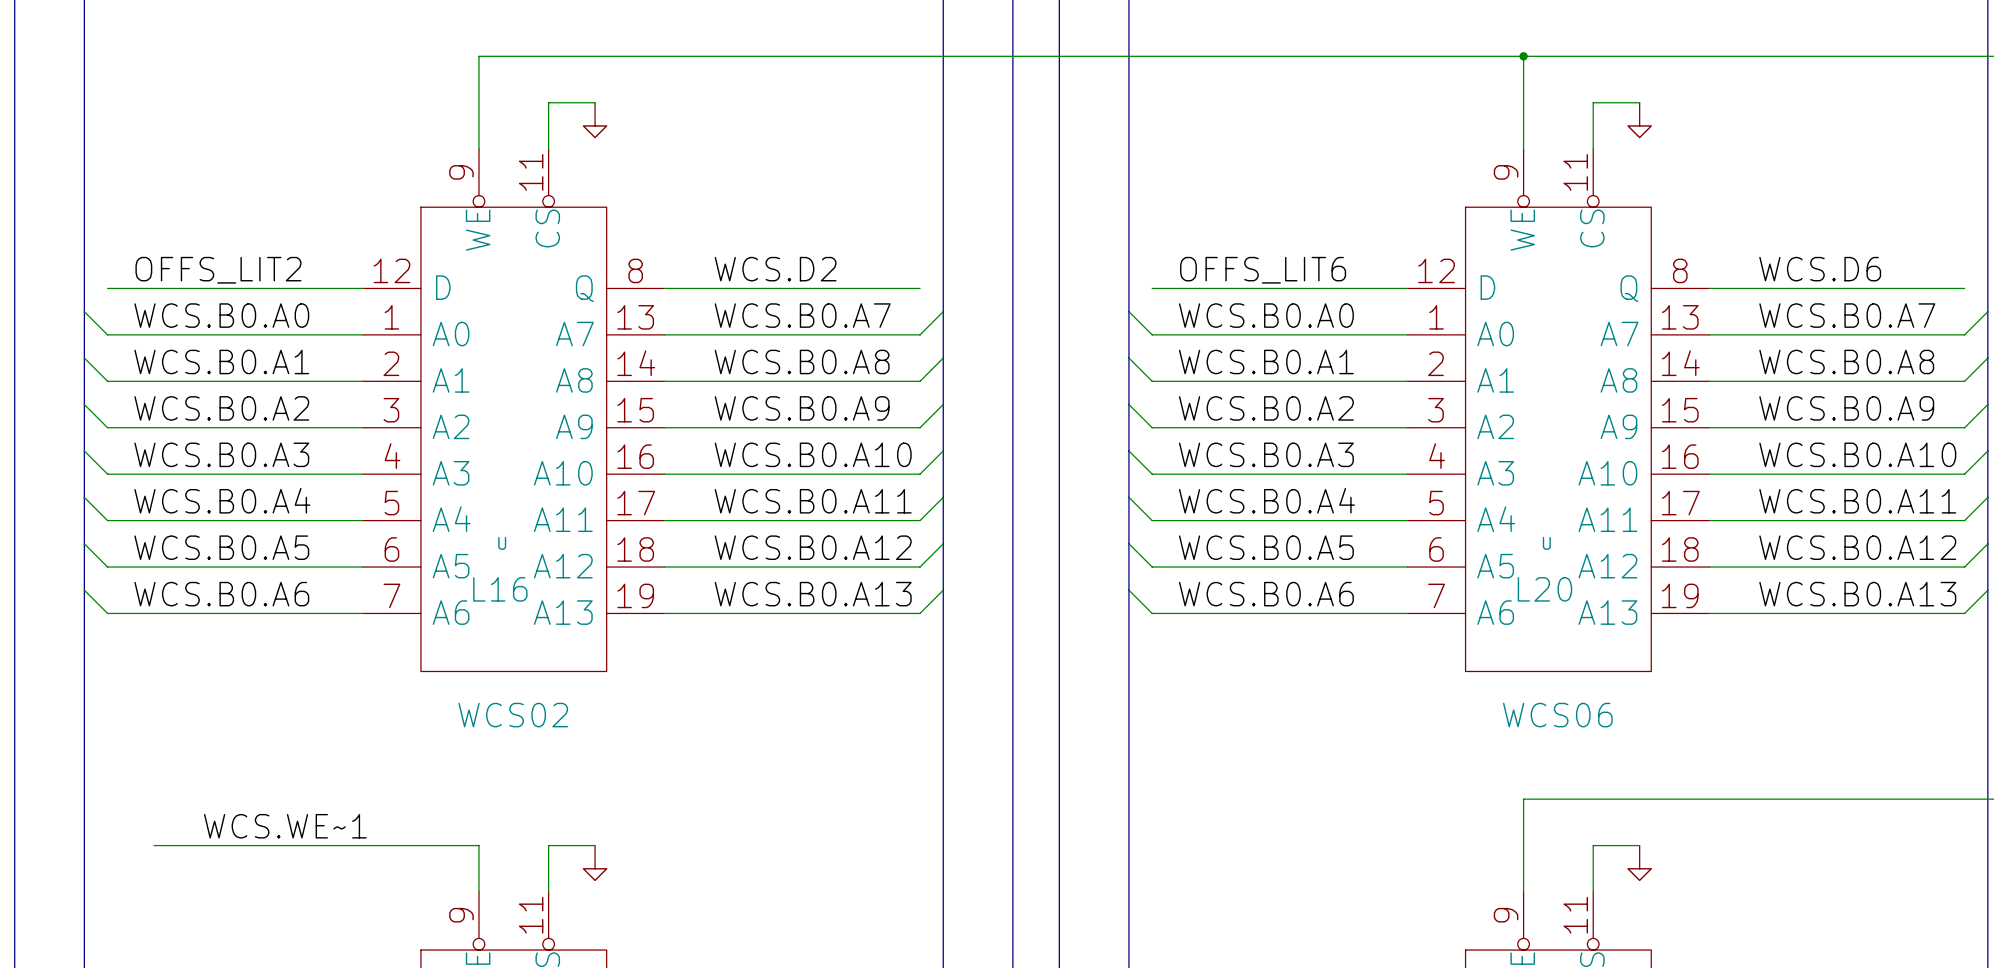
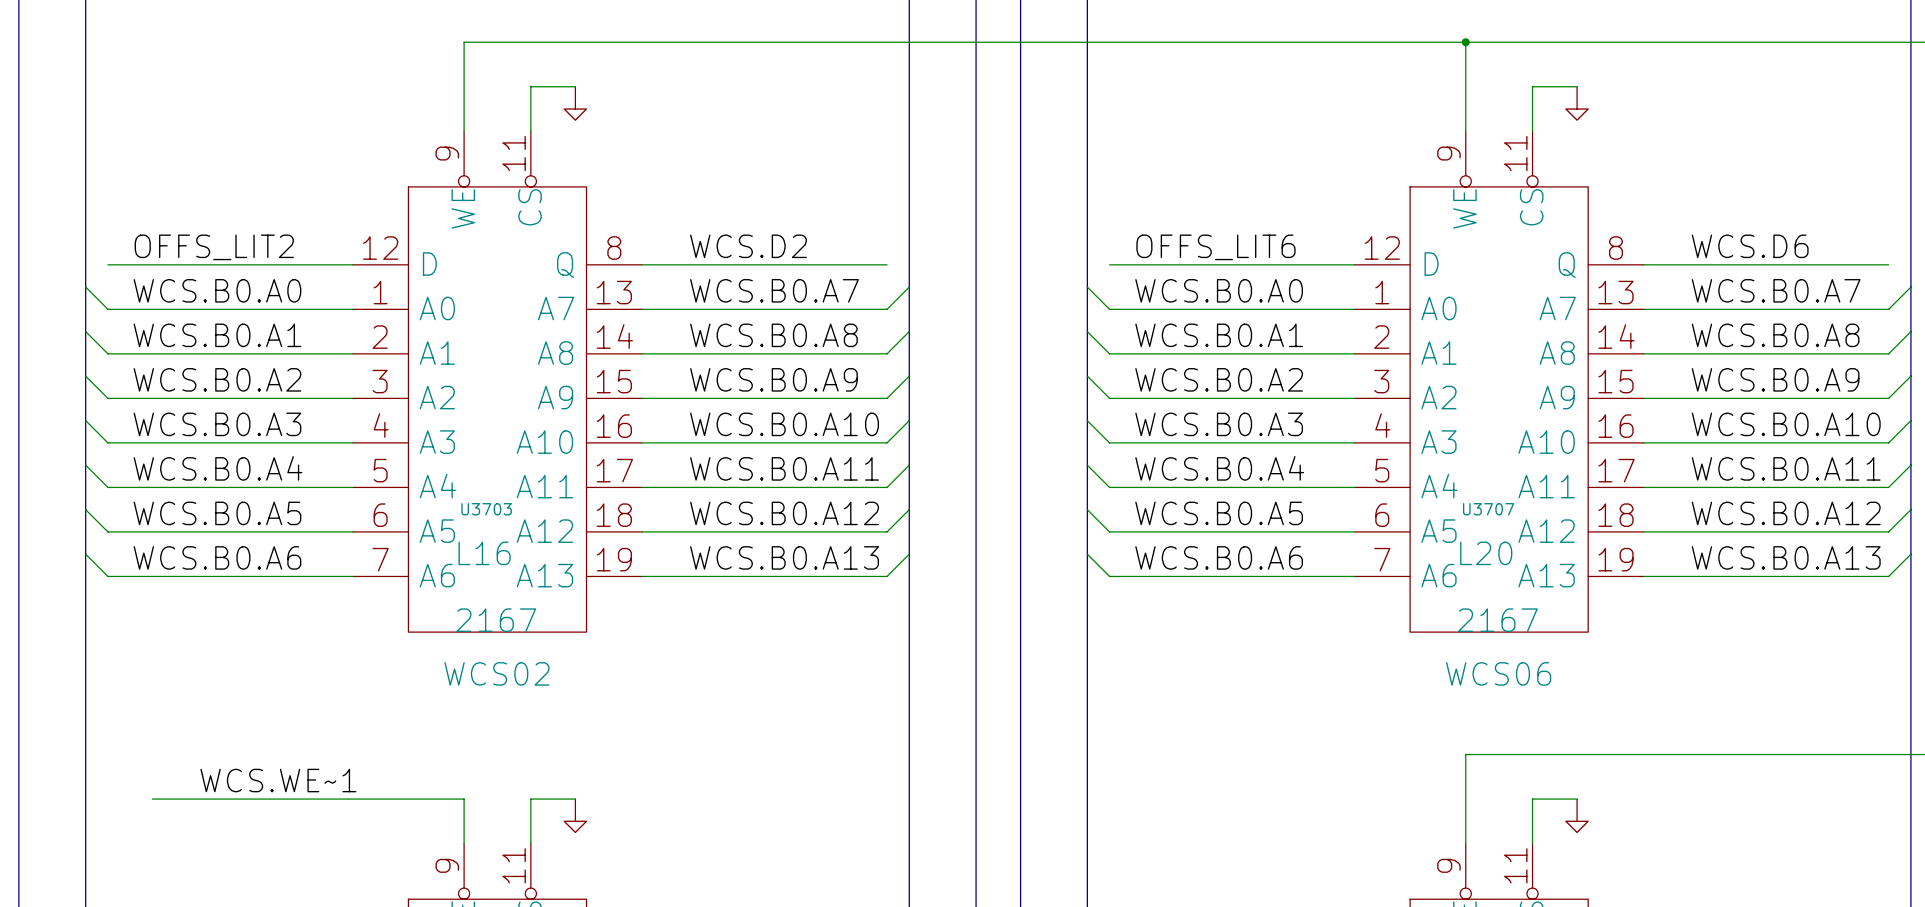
U name: U (502, 543) -> U3703 (486, 509)
U name: U (1546, 543) -> U3707 (1488, 509)
U value: none -> 2167 (496, 620)
U value: none -> 2167 (1497, 620)

